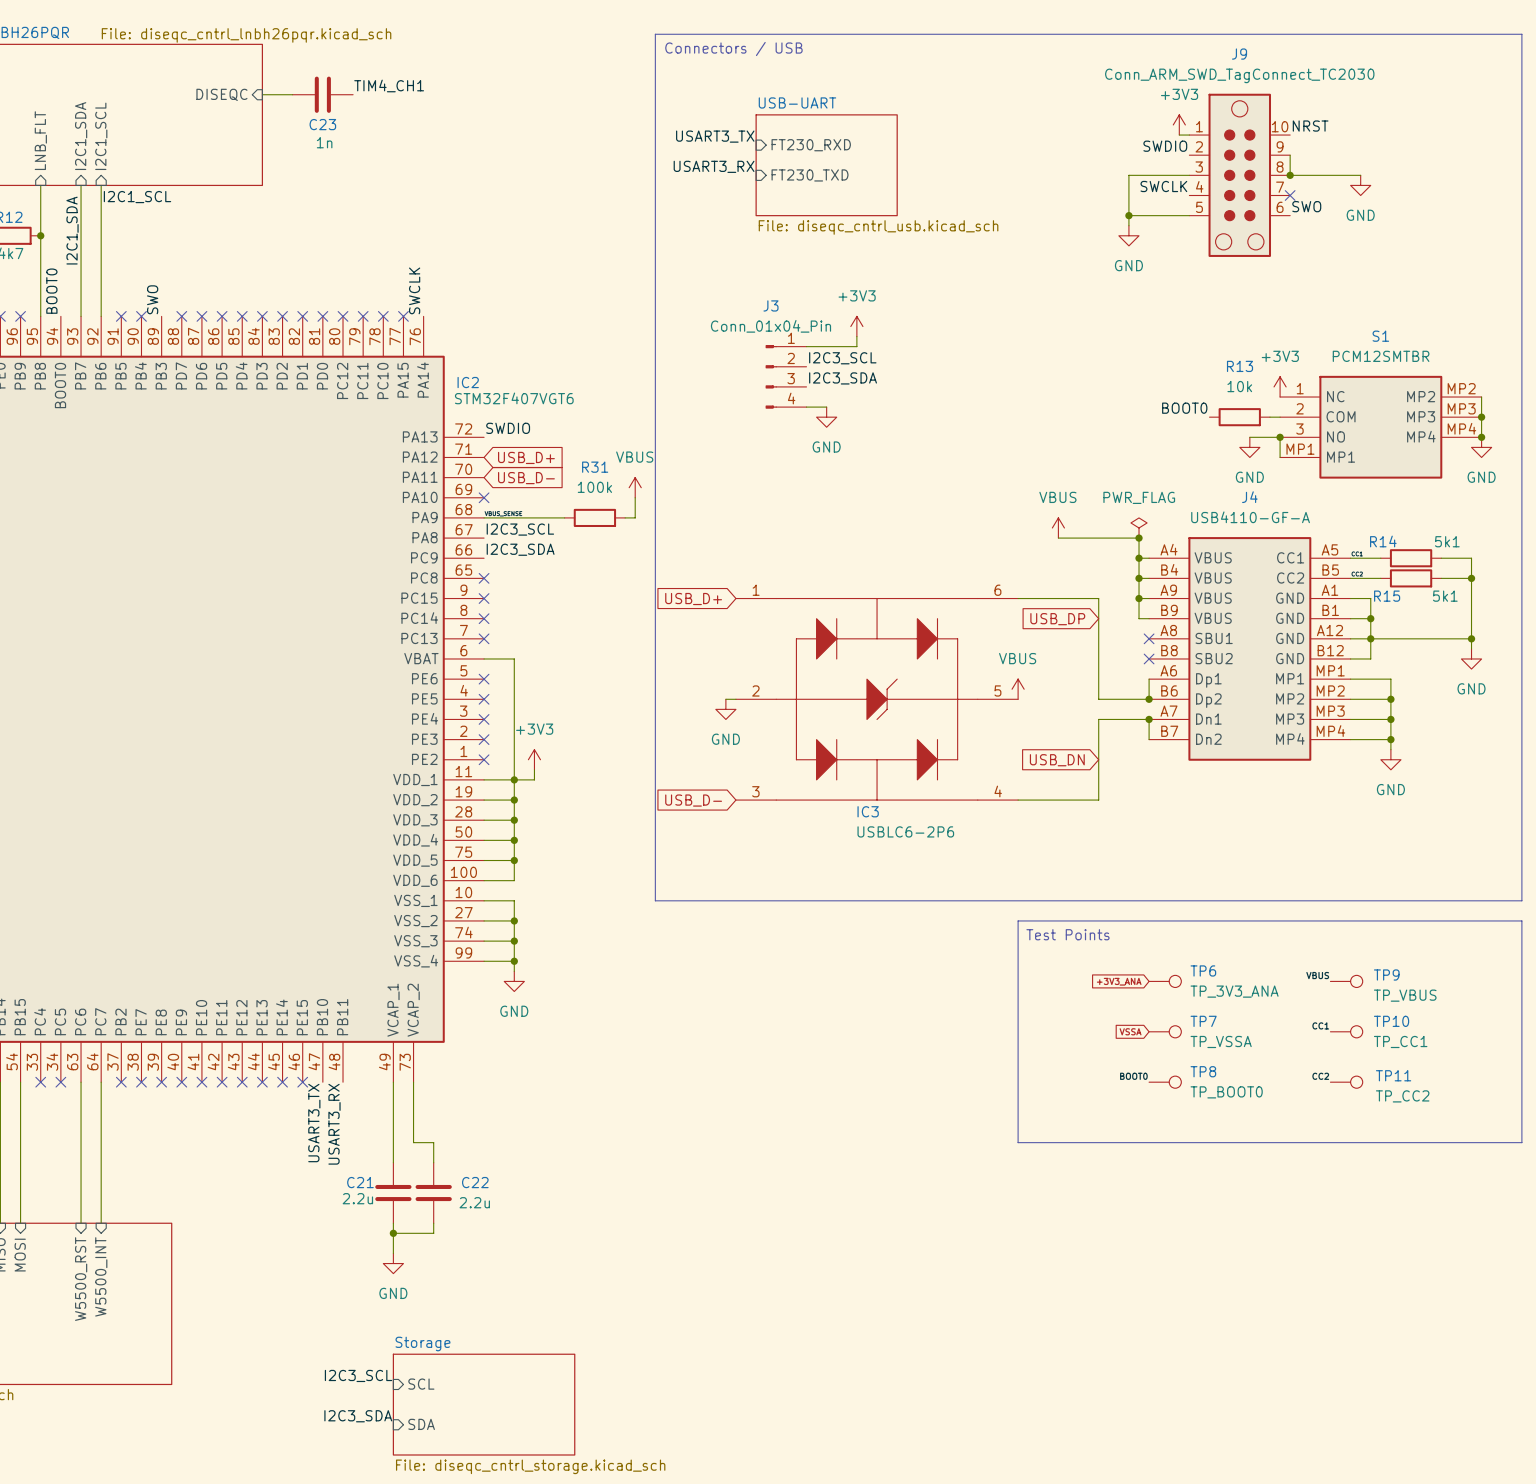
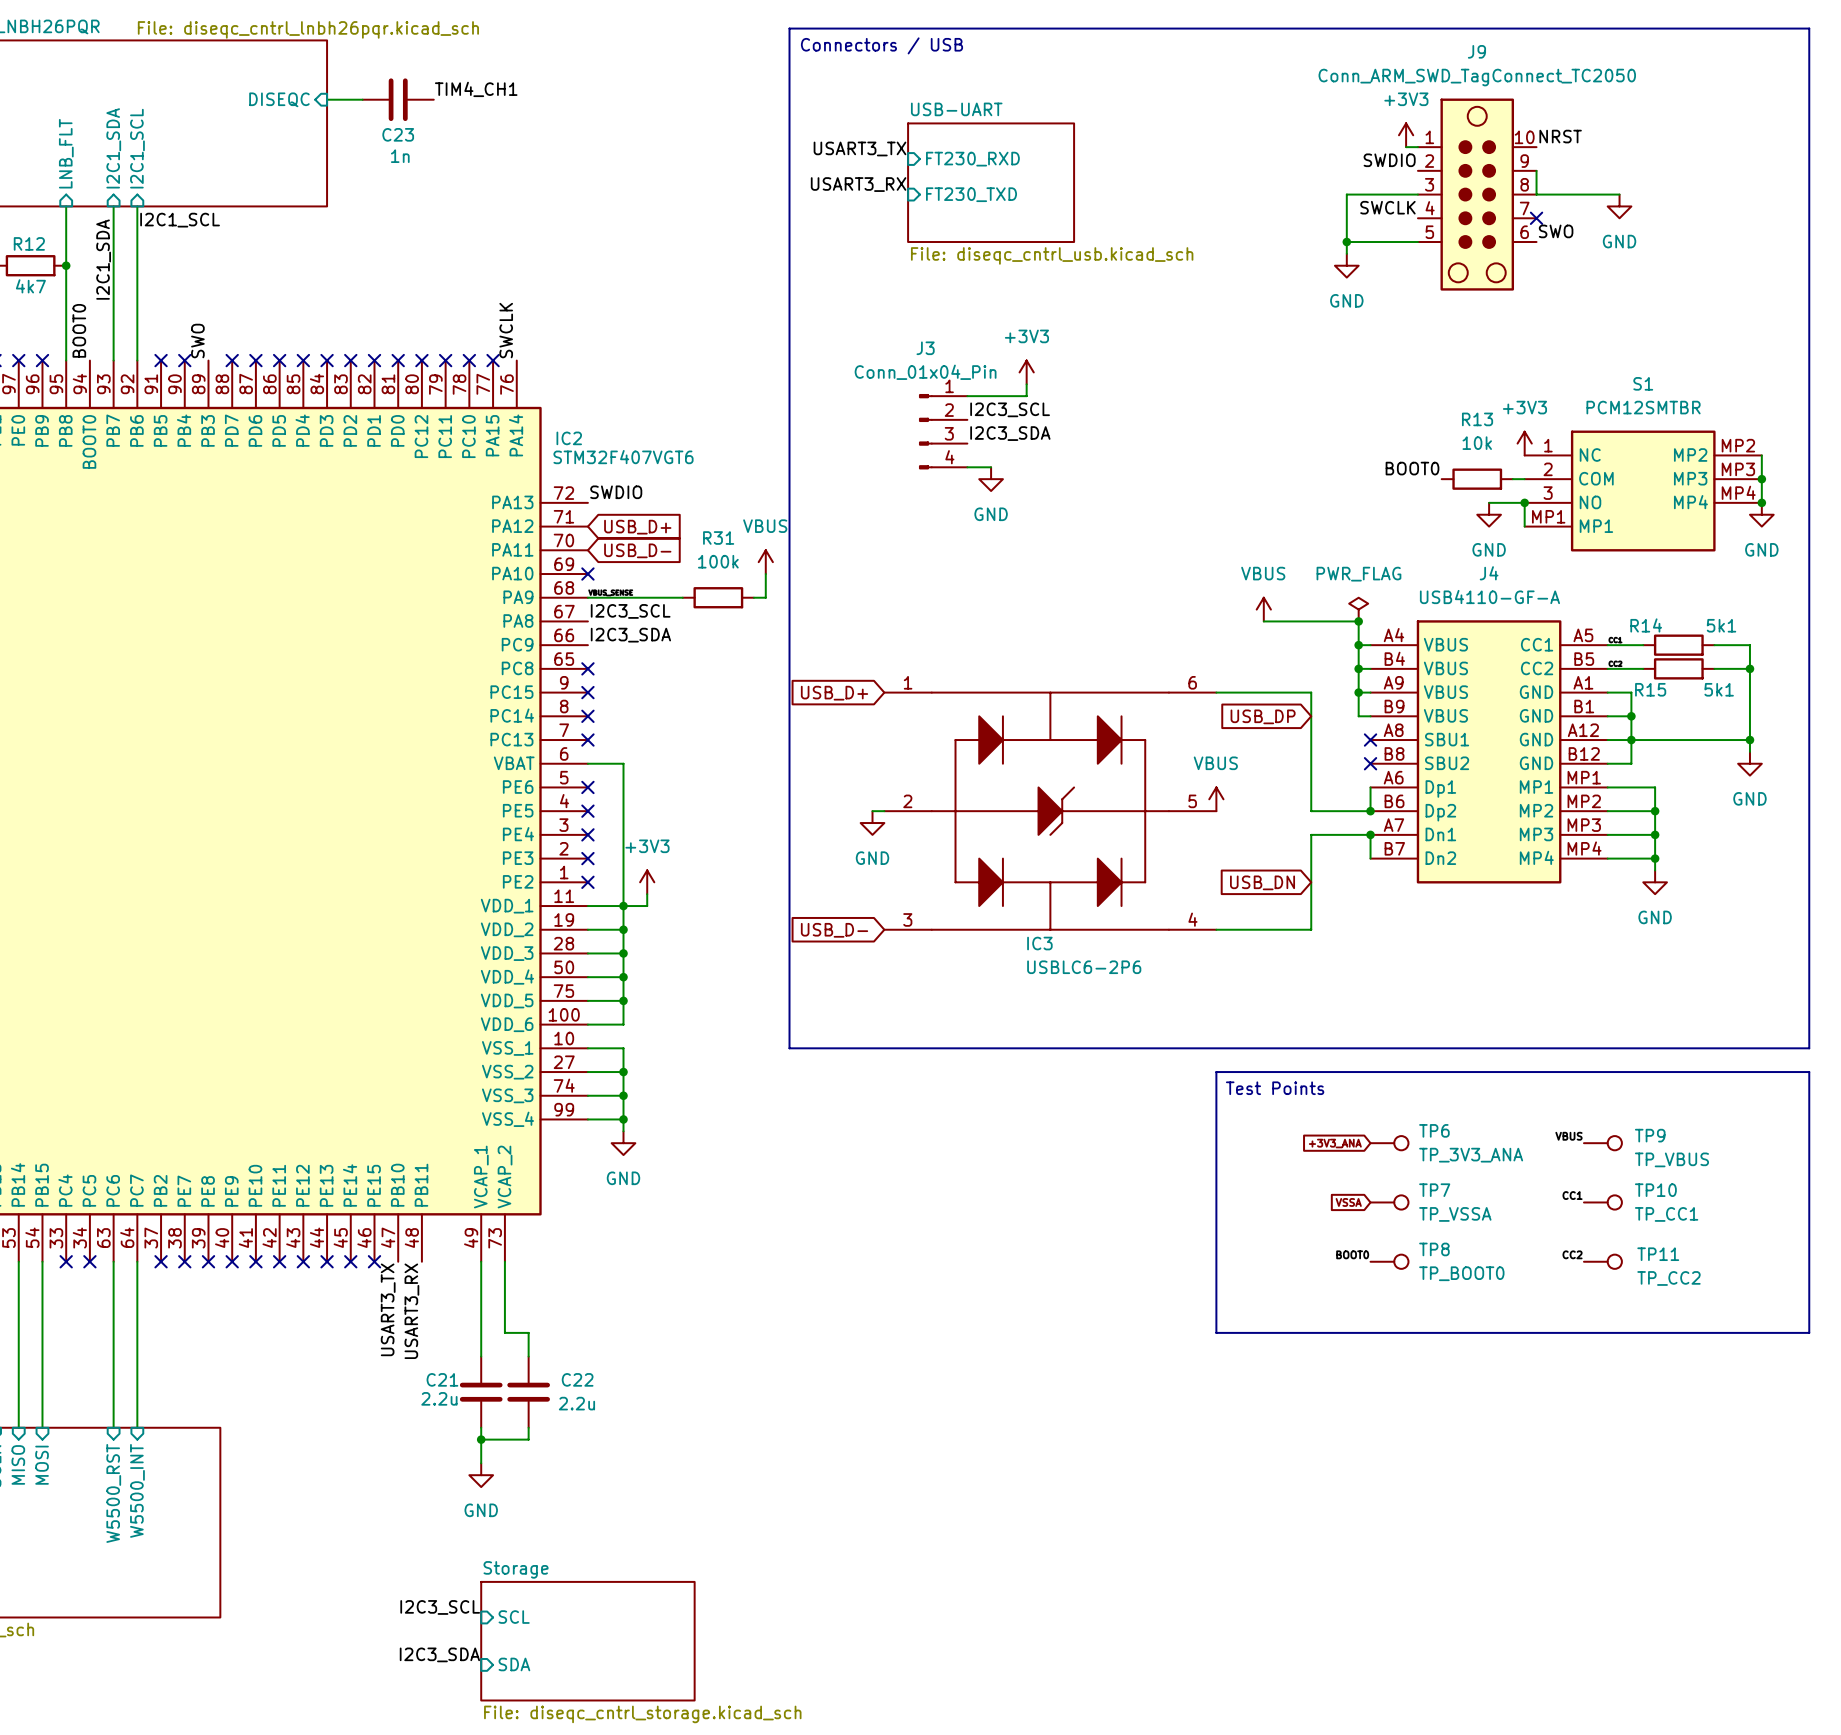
J9 value: Conn_ARM_SWD_TagConnect_TC2030 (1239, 75) -> Conn_ARM_SWD_TagConnect_TC2050 (1477, 77)
junction: (1290, 175) -> none

